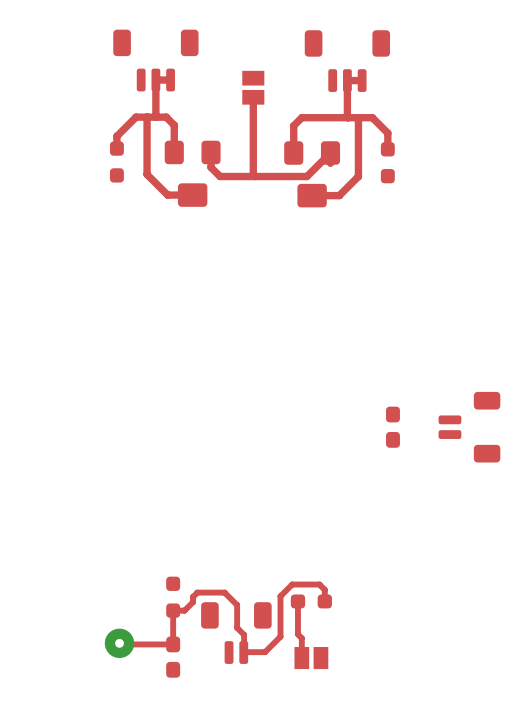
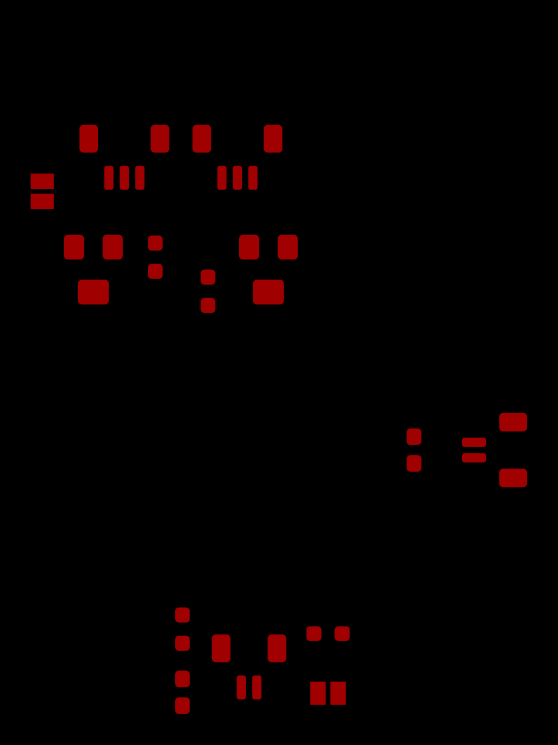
part: (155, 60) -> none
part: (347, 61) -> none
top track: (170, 80) (155, 80) (155, 117) -> none
top track: (362, 80) (347, 80) (348, 117) -> none
part position: (253, 87) -> (42, 191)
top track: (253, 97) (254, 176) -> none
top track: (147, 117) (147, 174) (167, 195) (192, 195) -> none
top track: (358, 117) (358, 176) (339, 195) (312, 195) -> none
part footprint: [109, 141, 124, 183] -> [79, 124, 170, 190]
top track: (116, 148) (116, 136) (136, 117) (166, 117) (174, 125) (174, 152) -> none
part: none -> (237, 157)
top track: (387, 149) (387, 133) (372, 117) (301, 117) (293, 125) (293, 152) -> none
top track: (211, 152) (211, 167) (220, 176) (306, 176) (330, 152) (330, 163) -> none
part: (387, 162) -> none
part: (192, 173) -> none
part: (312, 174) -> none
part: none -> (155, 257)
part: none -> (93, 269)
part: none -> (268, 269)
part: none -> (207, 291)
top track: (297, 601) (297, 634) (301, 638) (301, 658) -> none
top track: (324, 601) (324, 589) (319, 584) (292, 584) (280, 596) (280, 636) (265, 652) (244, 652) -> none
top track: (119, 643) (173, 644) (173, 610) (184, 610) (193, 602) (193, 597) (197, 592) (224, 592) (237, 605) (237, 627) (244, 634) (244, 652) -> none
via: (119, 643) -> none

